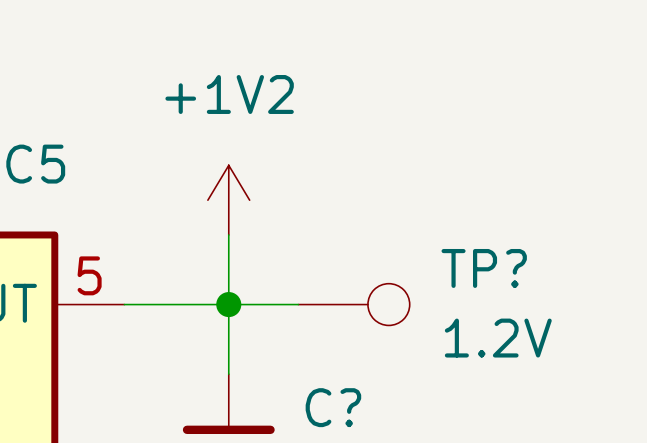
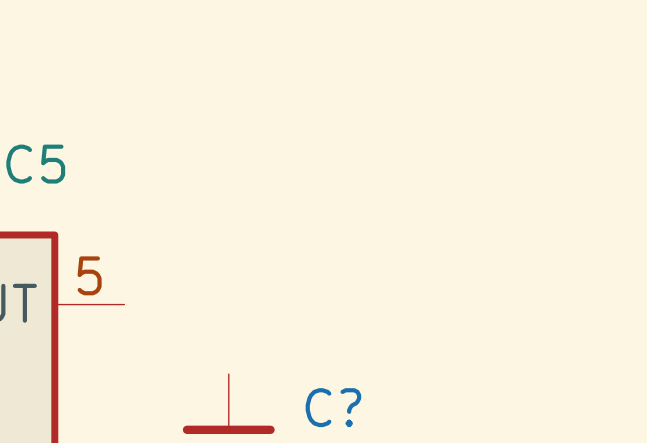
power symbol: +1V2 (228, 200) -> none
wire: (228, 234) (228, 374) -> none
wire: (124, 304) (298, 304) -> none
junction: (228, 304) -> none
TP?: 1.2V (354, 304) -> none

